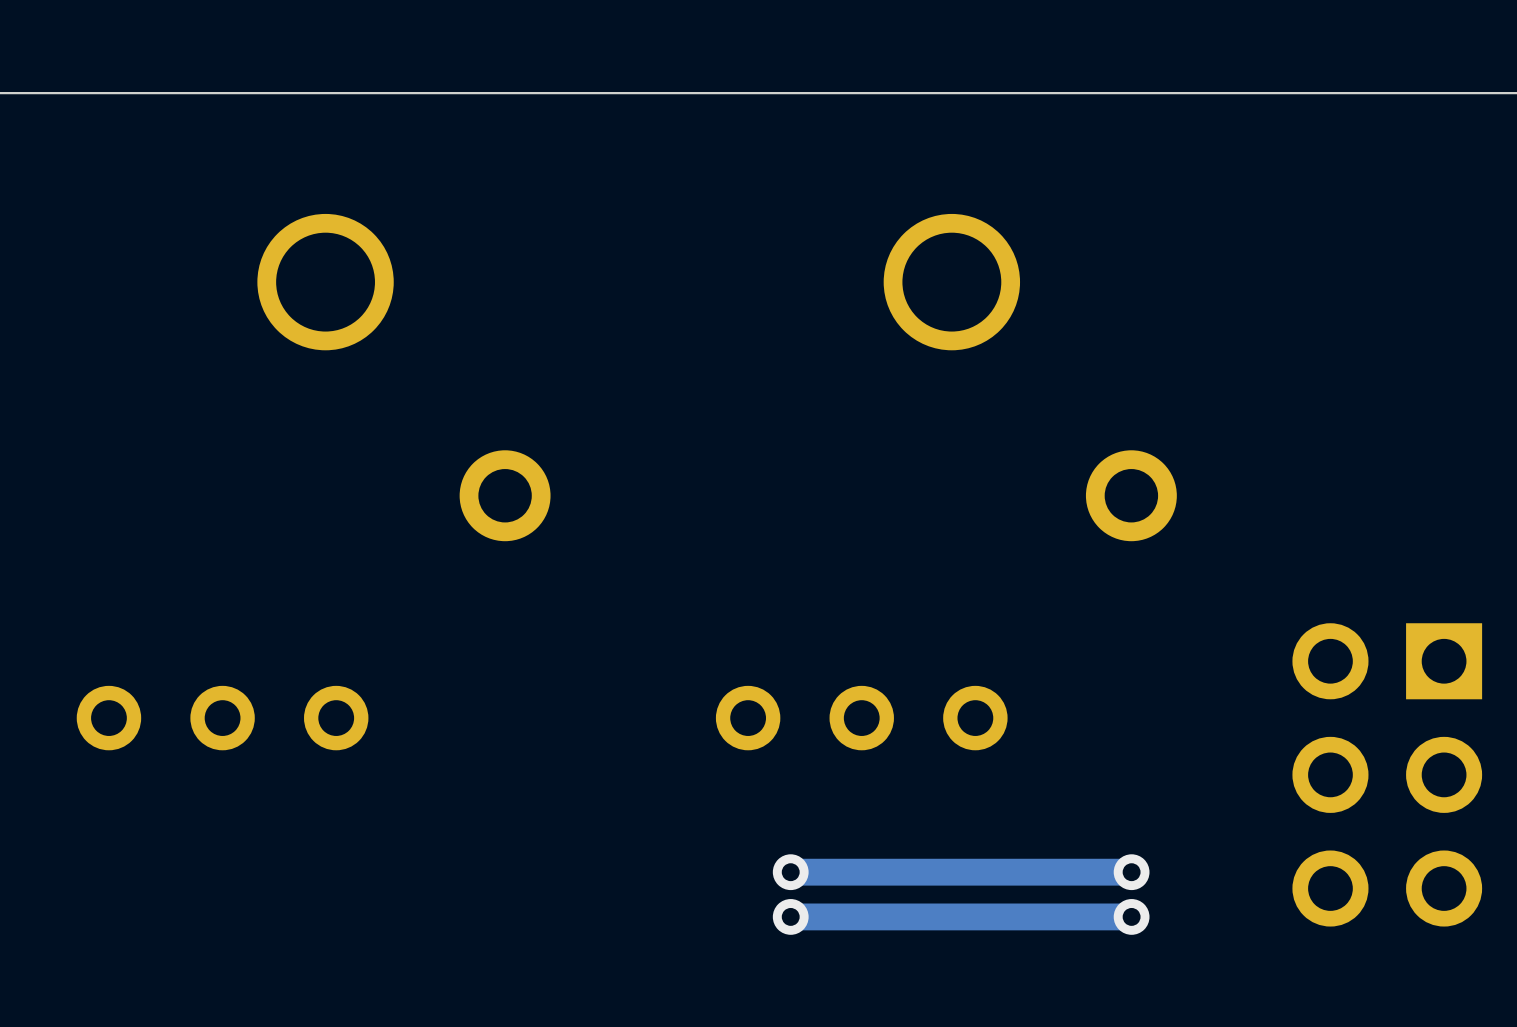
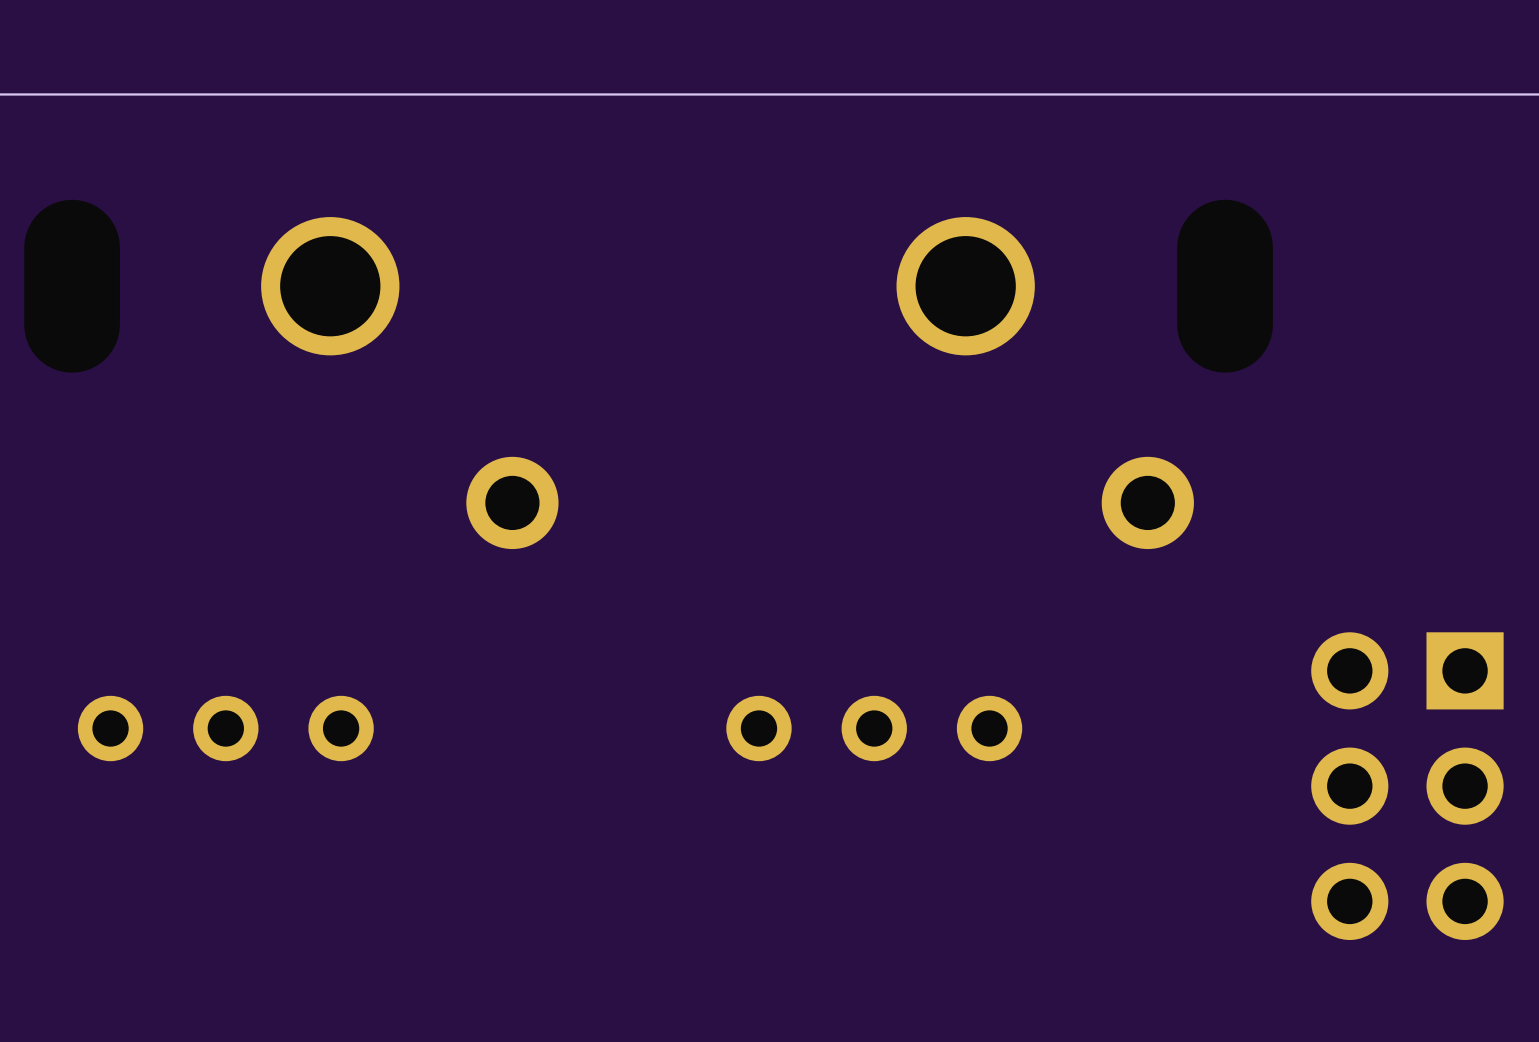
via: (790, 872) -> none
track: (1131, 872) (790, 872) -> none
via: (1131, 872) -> none
via: (790, 916) -> none
track: (1131, 916) (790, 916) -> none
via: (1131, 916) -> none

